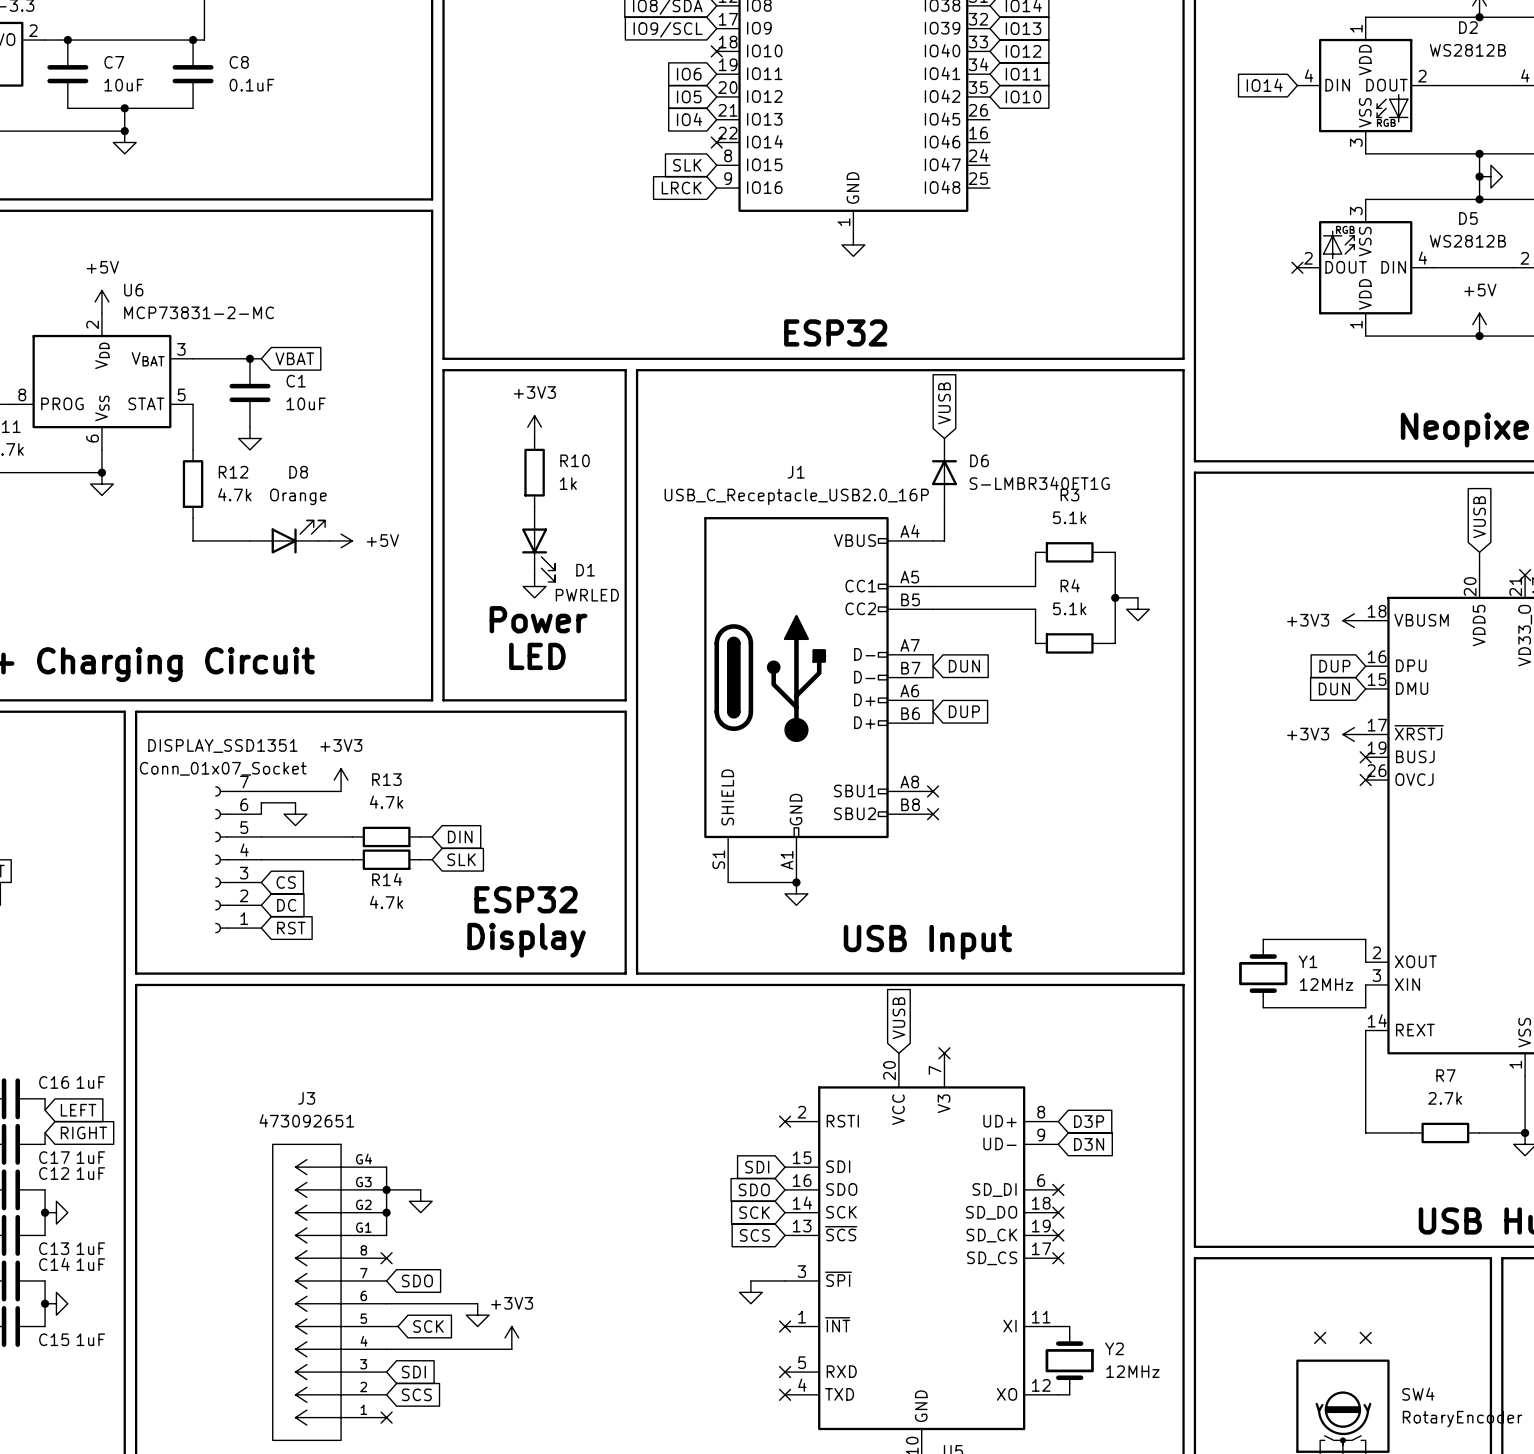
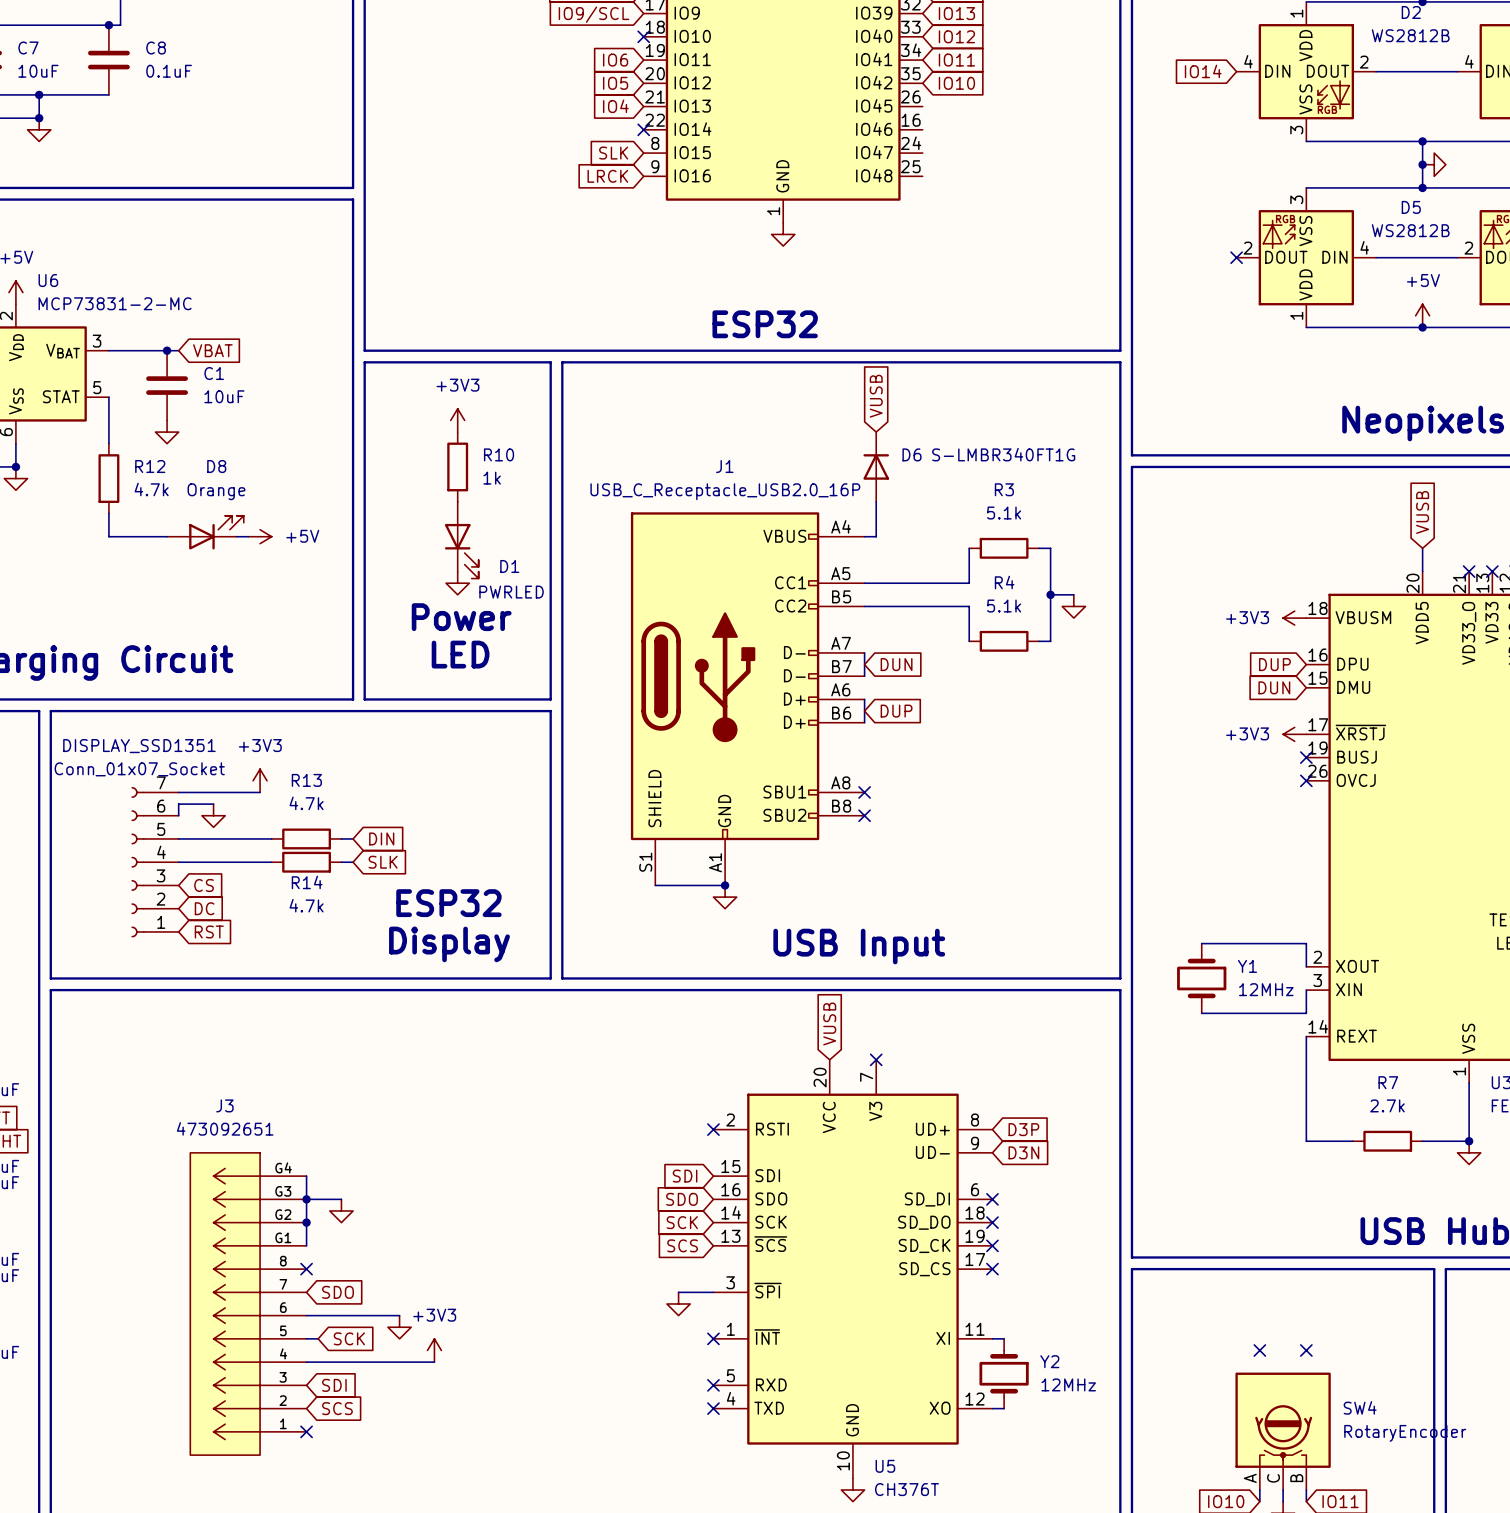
D6 value position: S-LMBR340FT1G (1039, 483) -> S-LMBR340FT1G (1003, 454)

